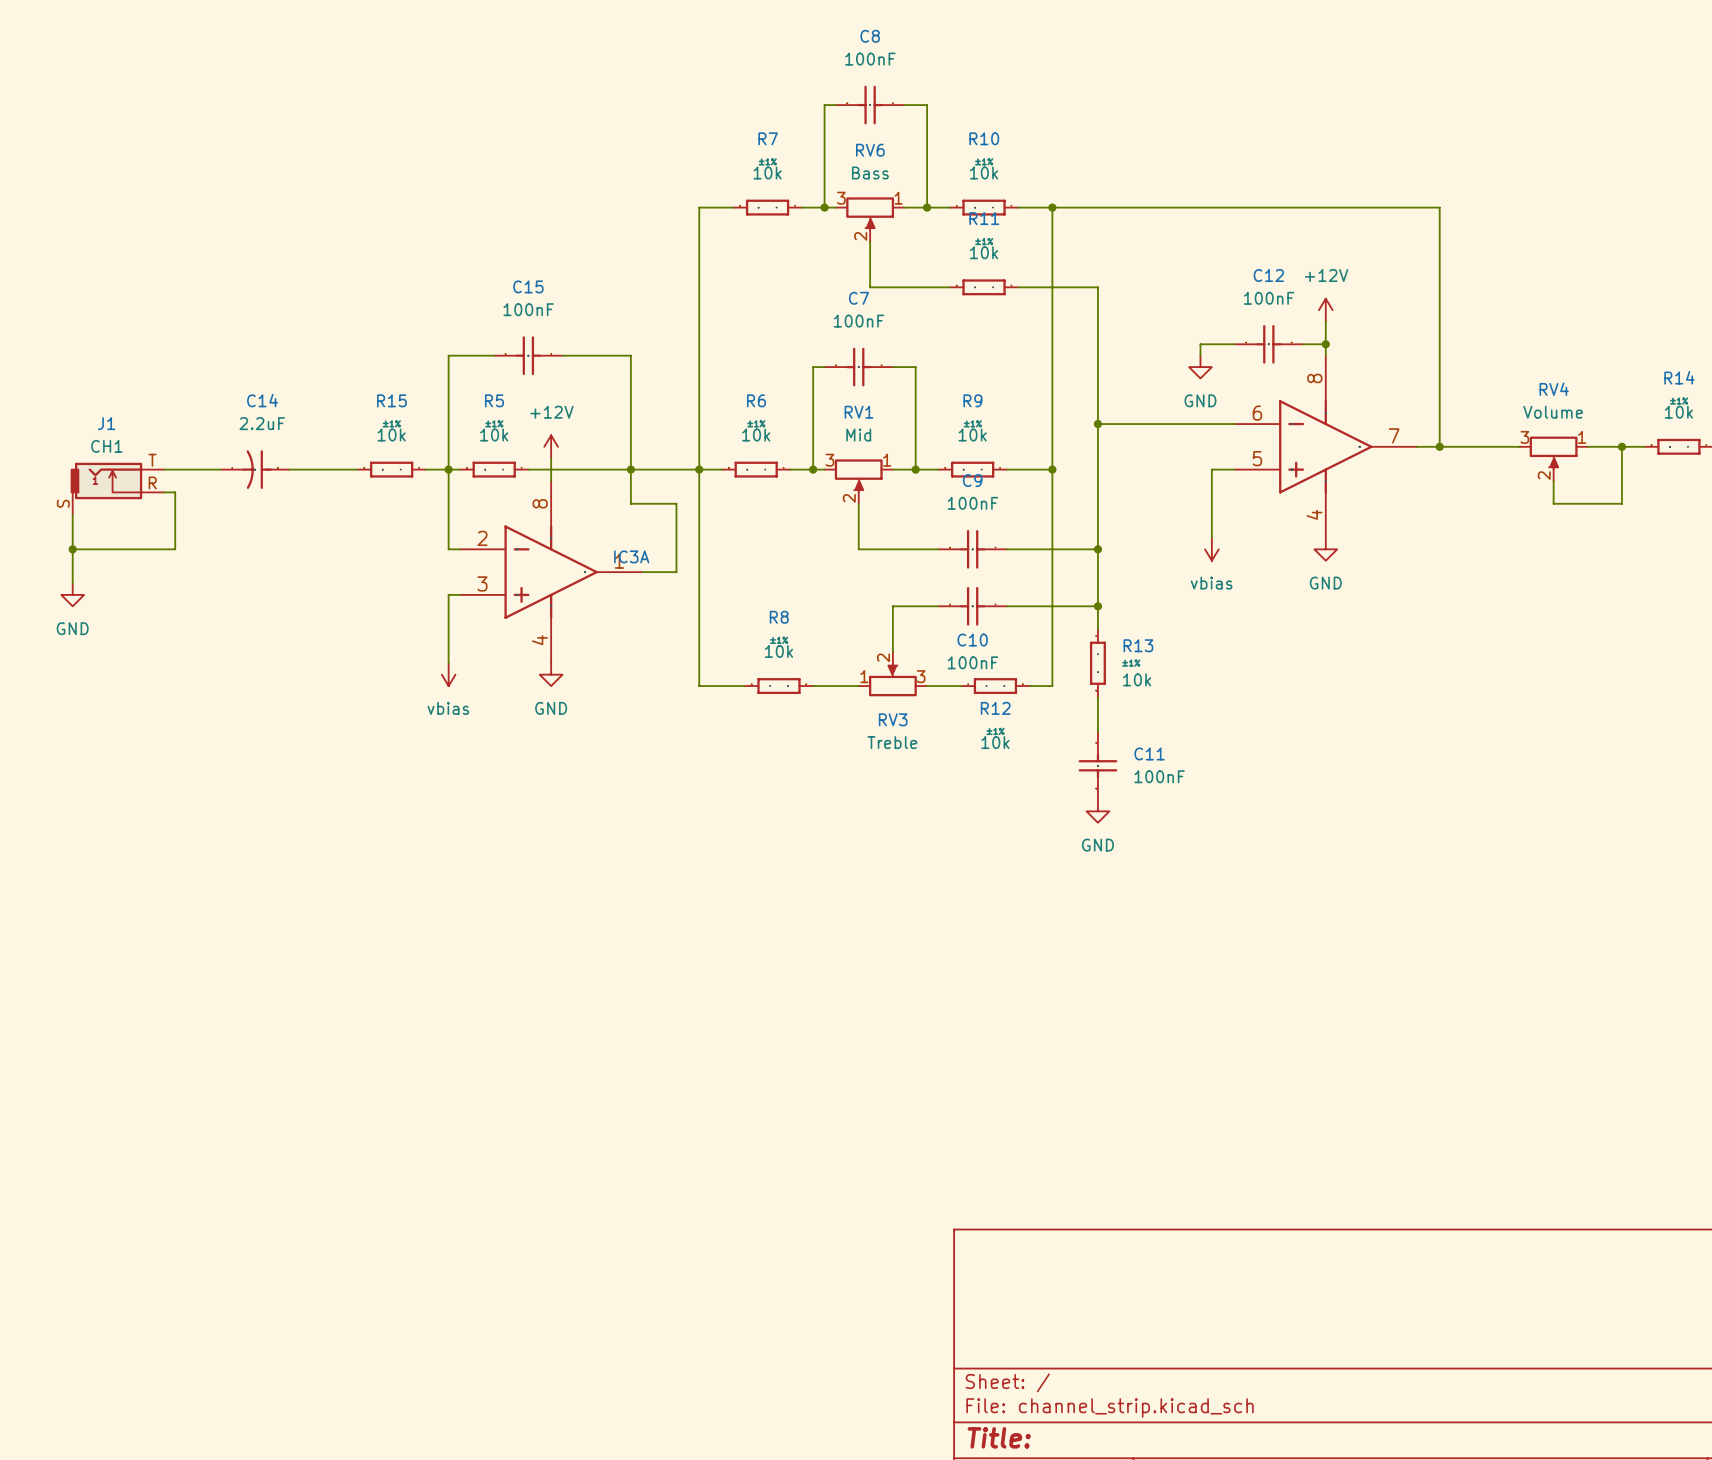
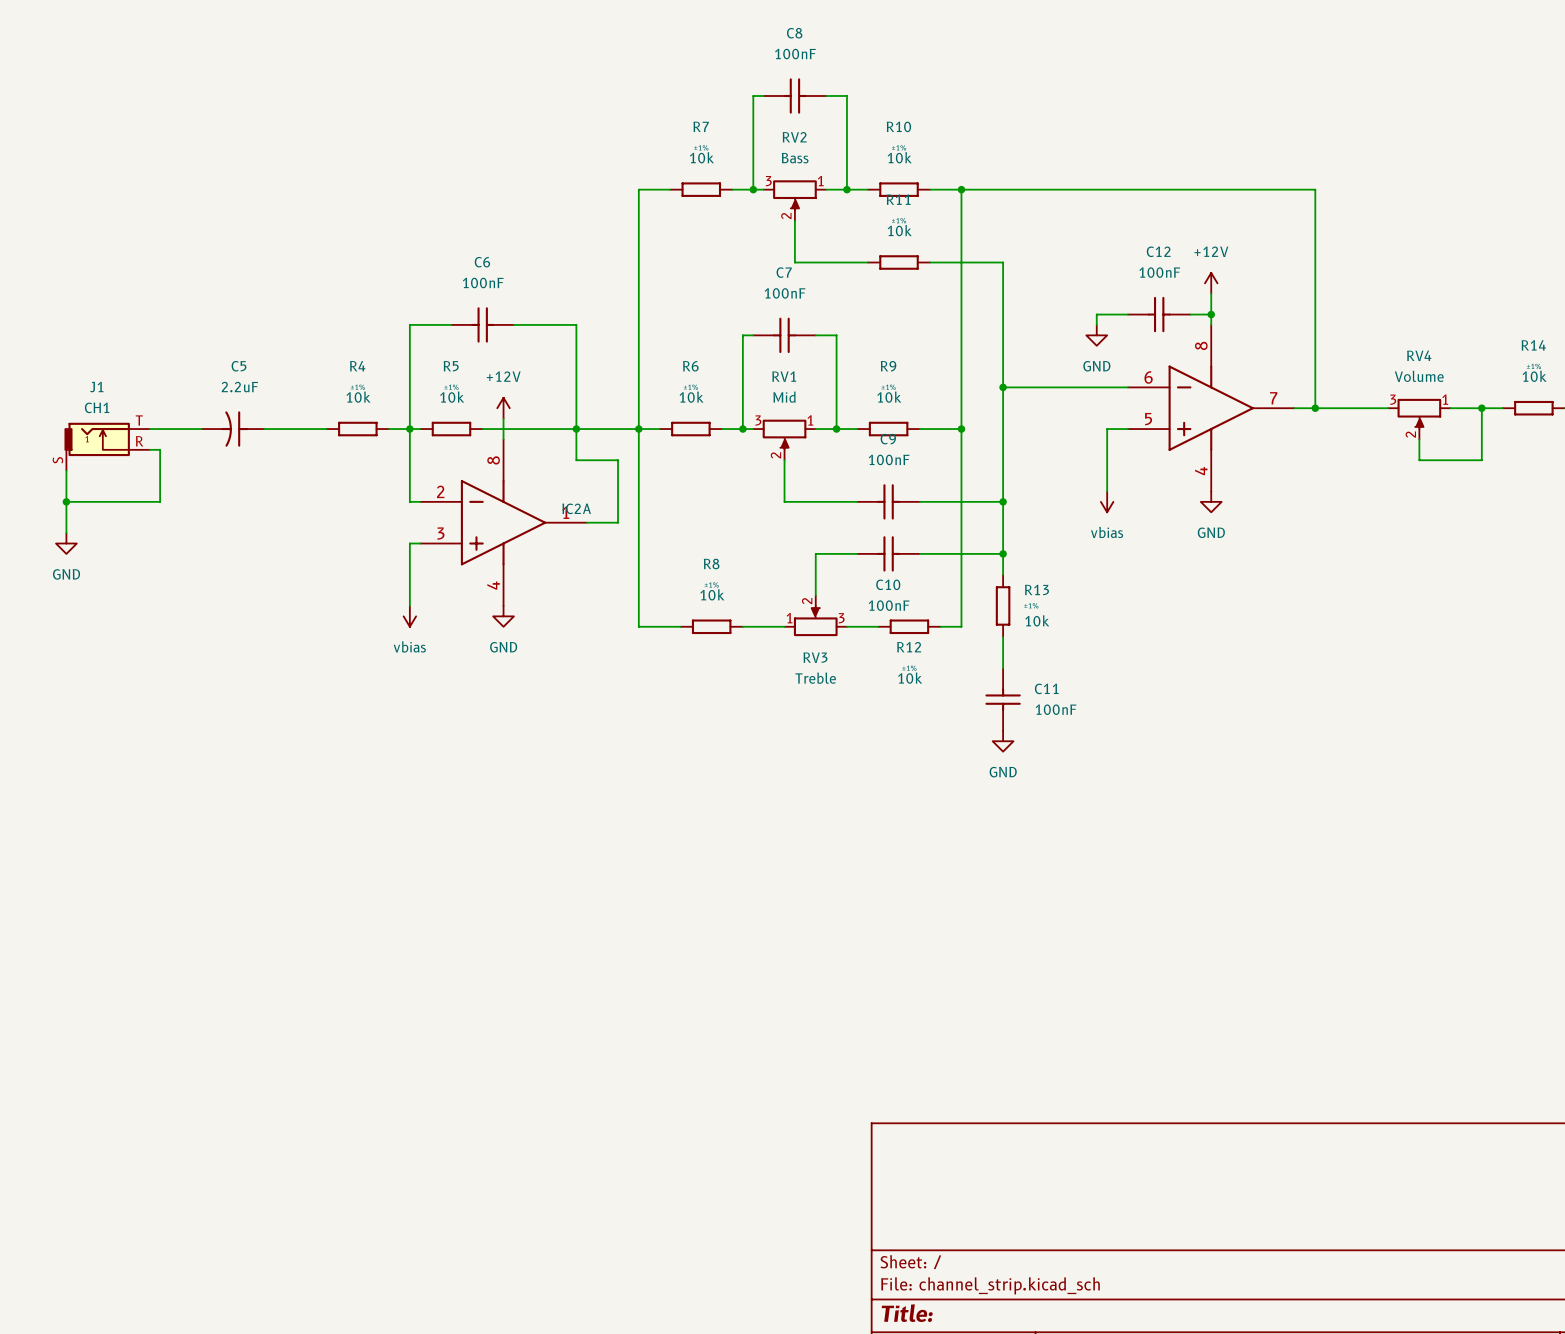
RV6 name: RV6 (870, 150) -> RV2 (794, 137)
C15 name: C15 (528, 286) -> C6 (482, 262)
C14 name: C14 (262, 400) -> C5 (239, 366)
R15 name: R15 (391, 400) -> R4 (357, 366)
IC3A name: IC3A (631, 556) -> IC2A (576, 508)

